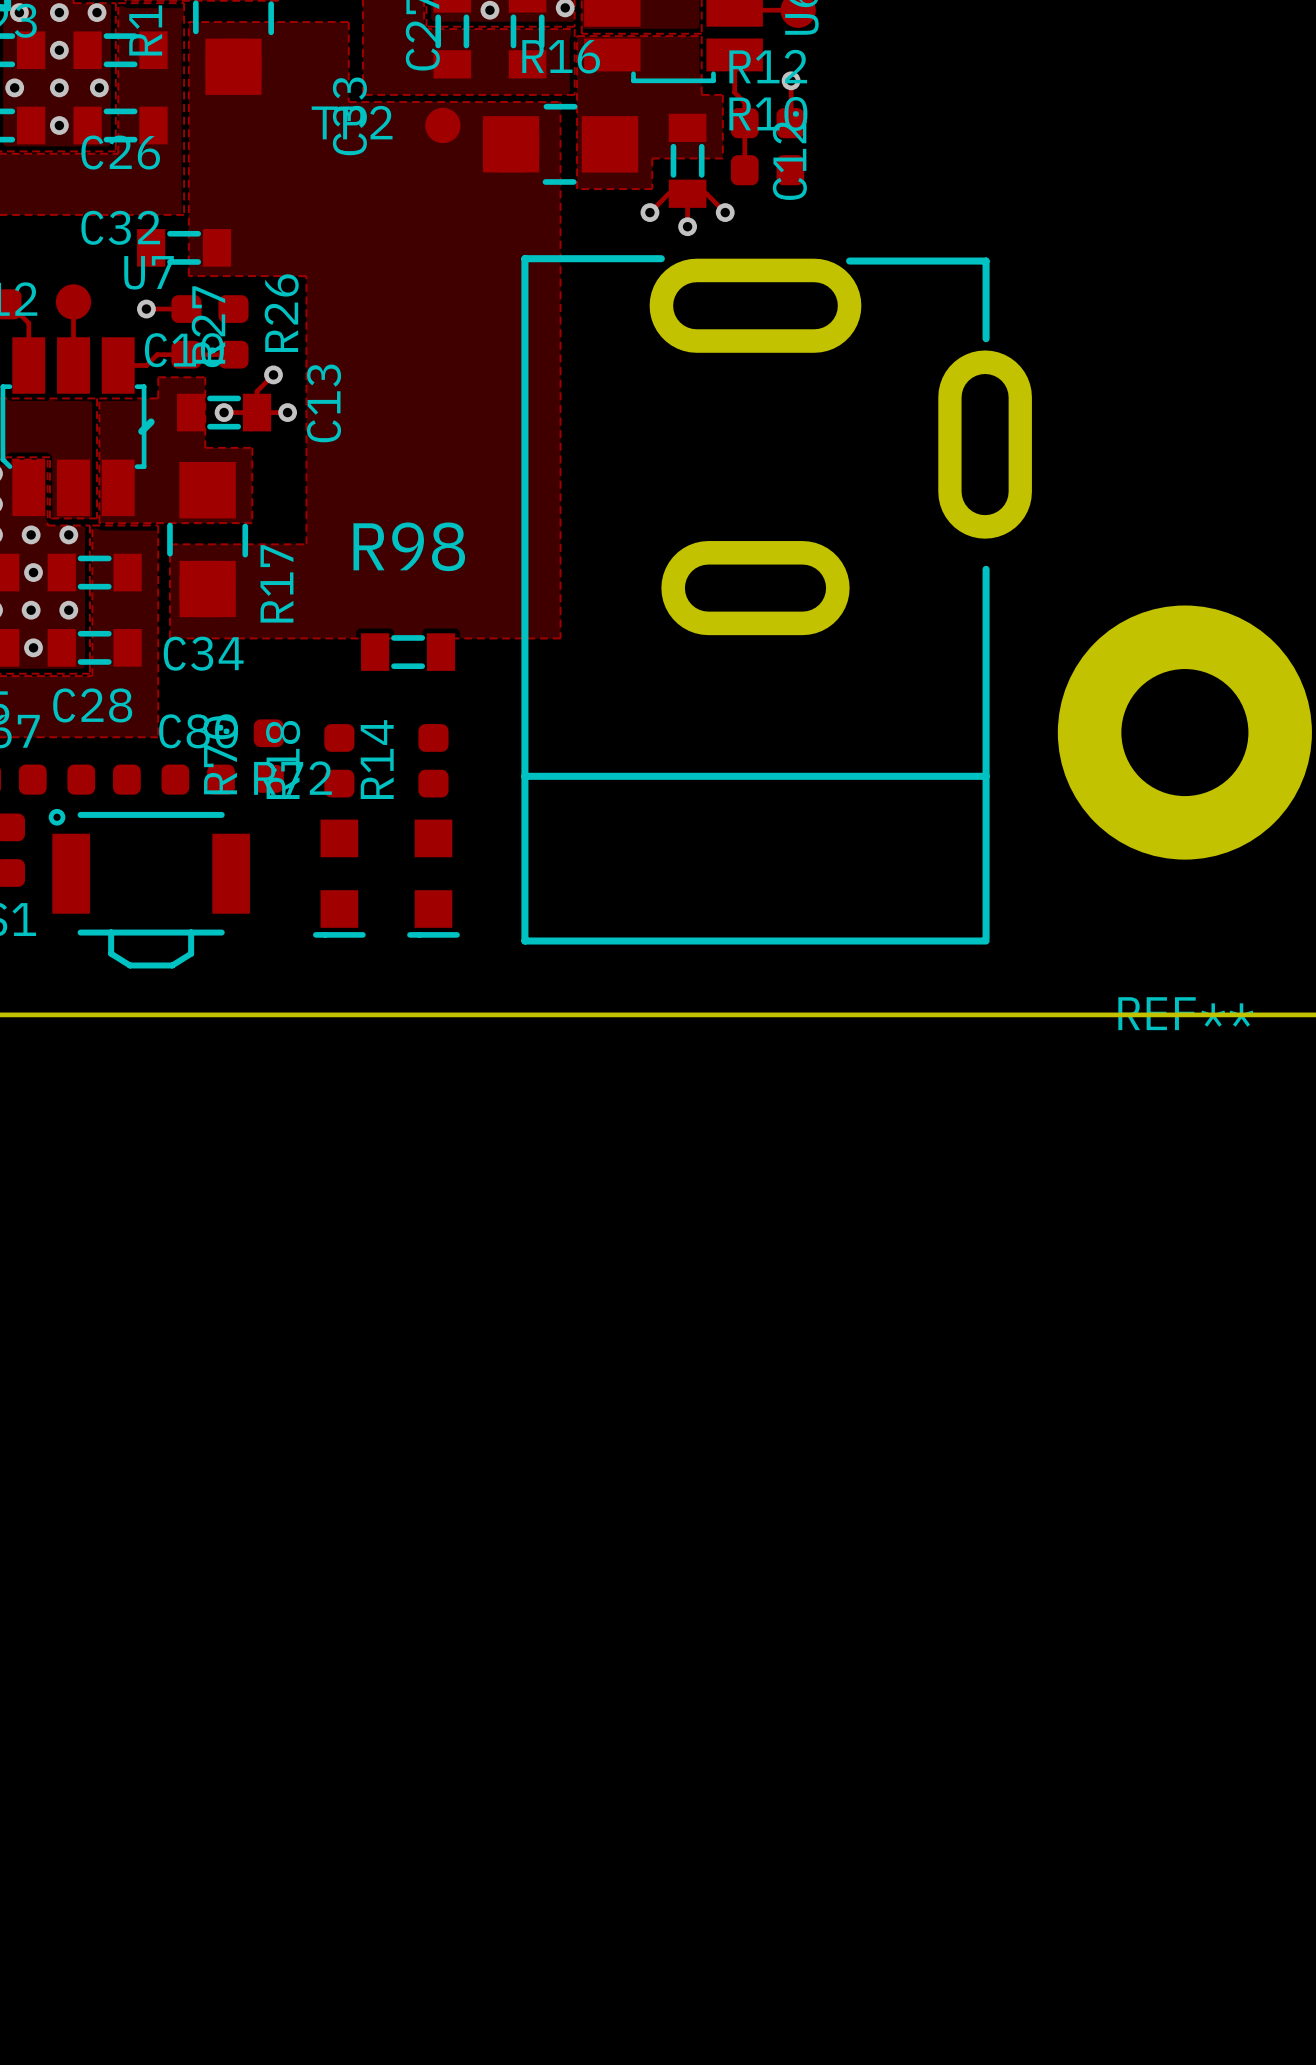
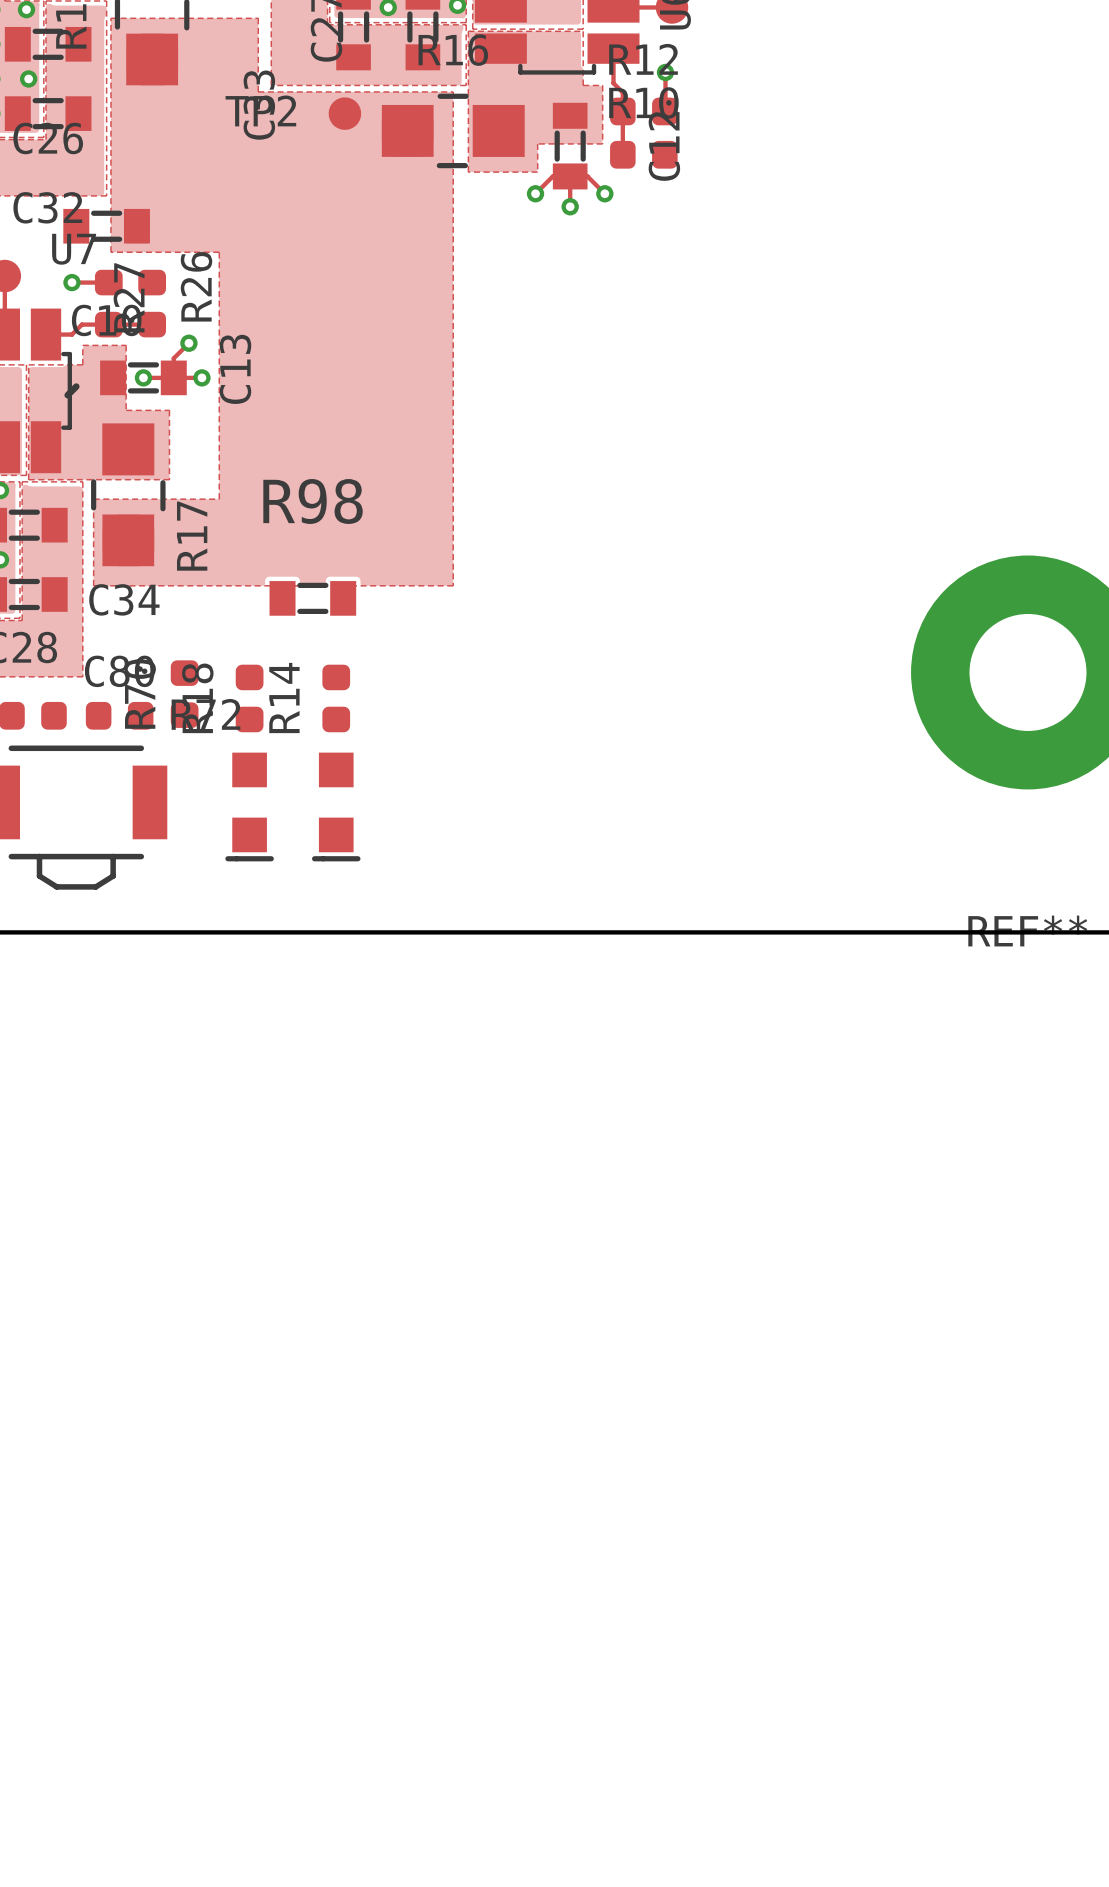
part: (776, 599) -> none

